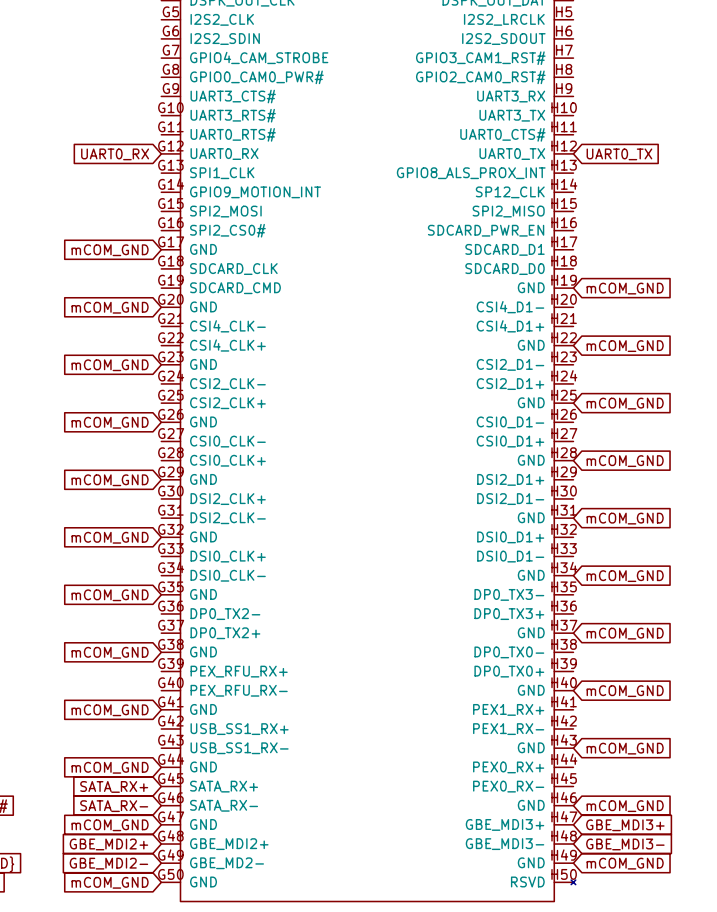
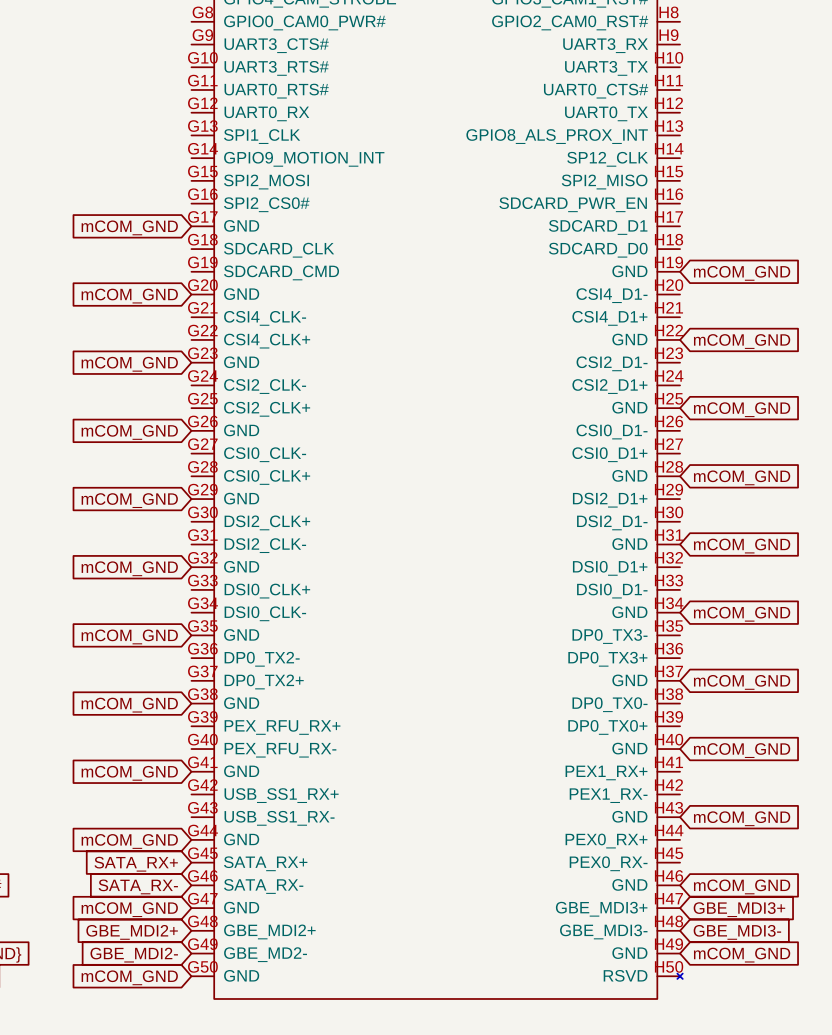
global label: UART0_RX (115, 154) -> none
global label: UART0_TX (619, 154) -> none

